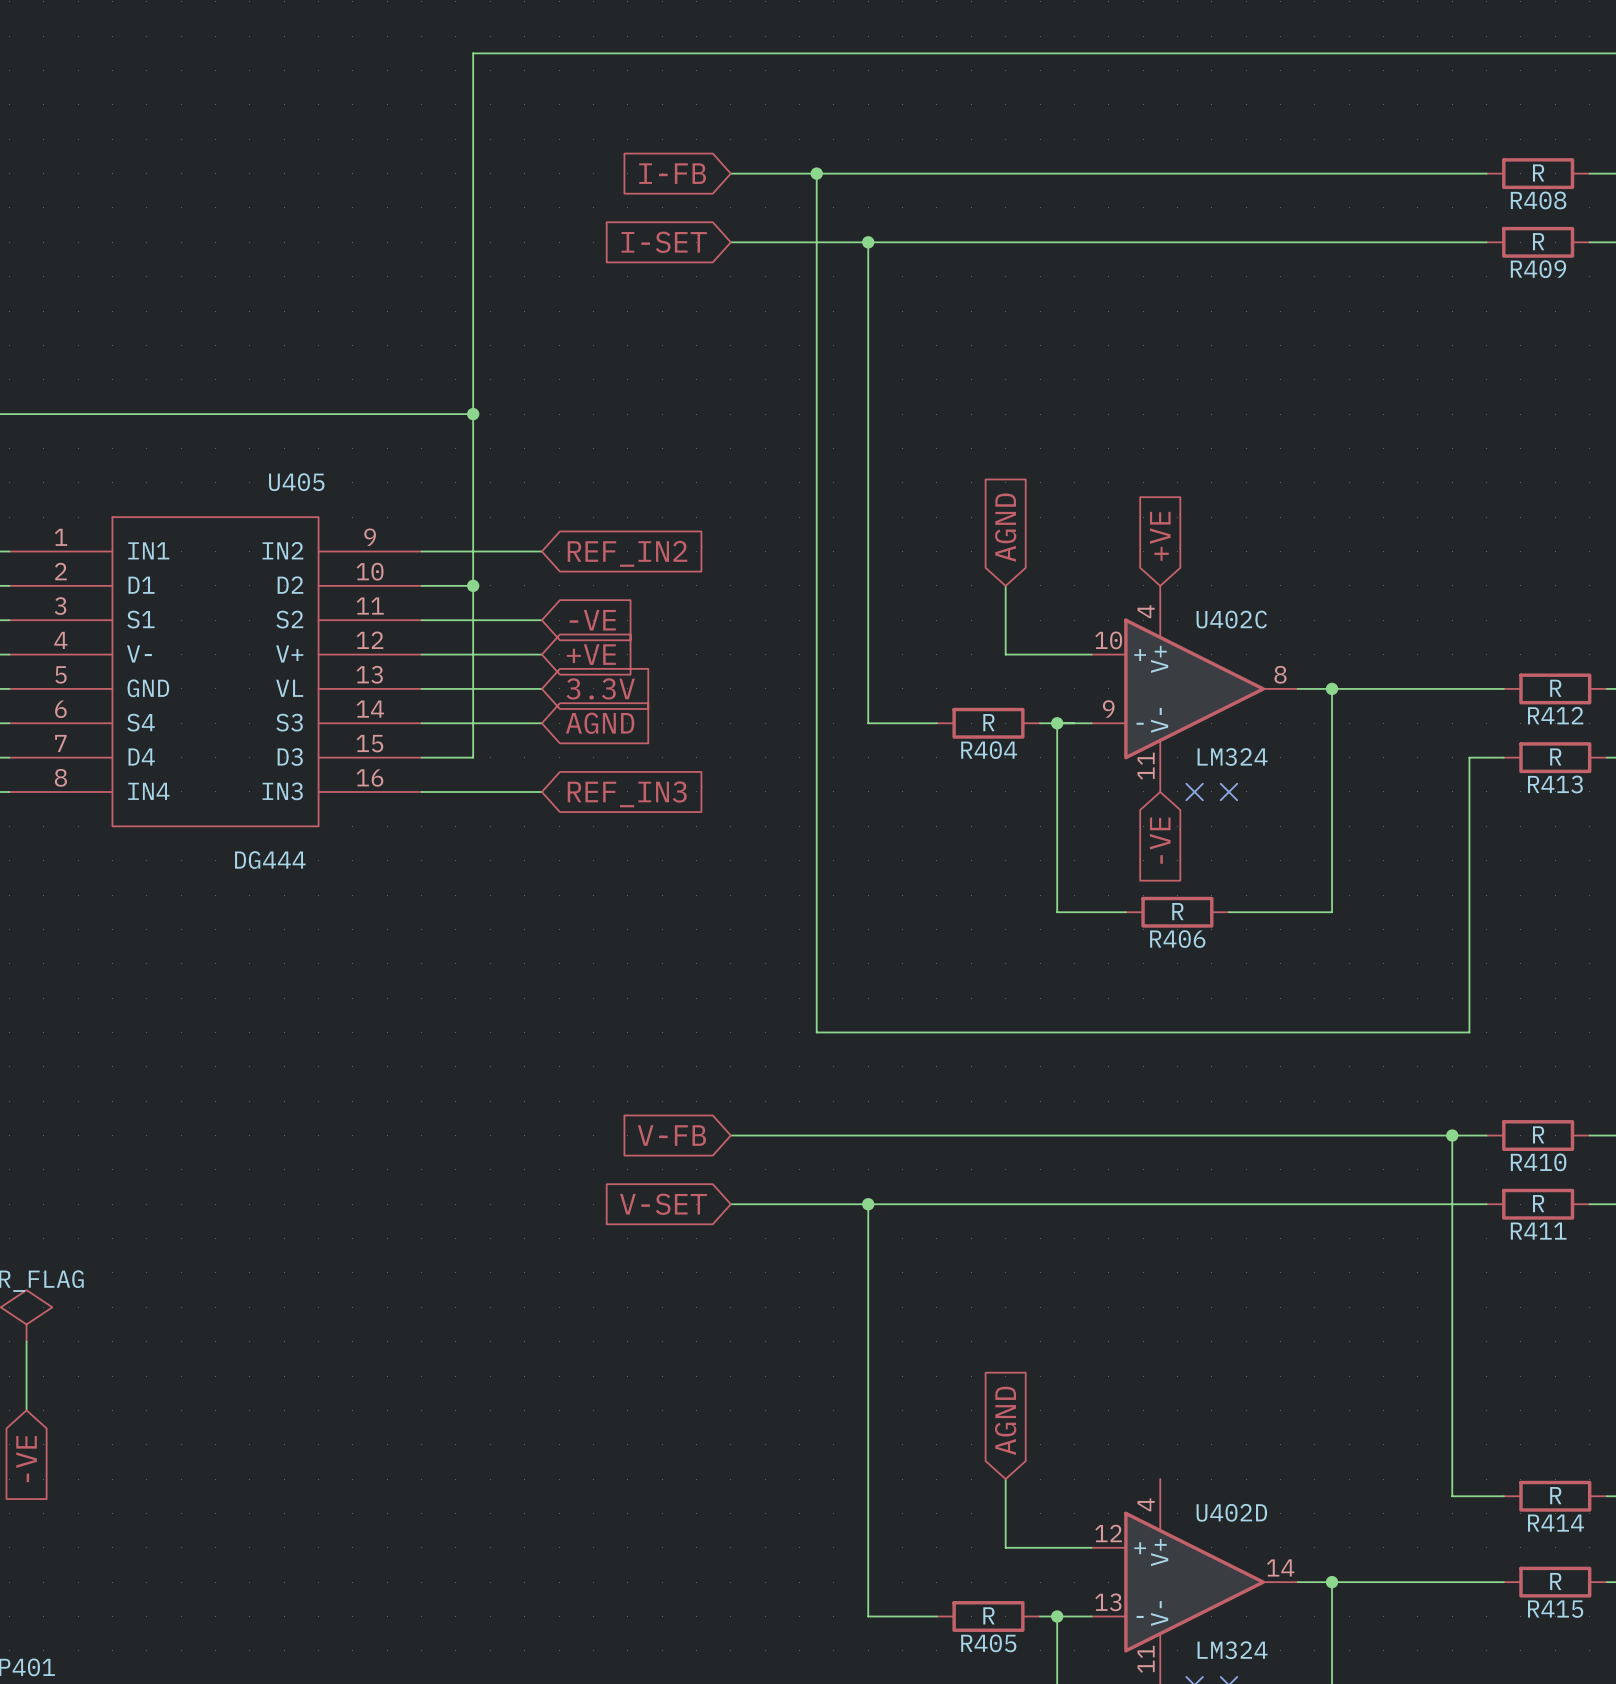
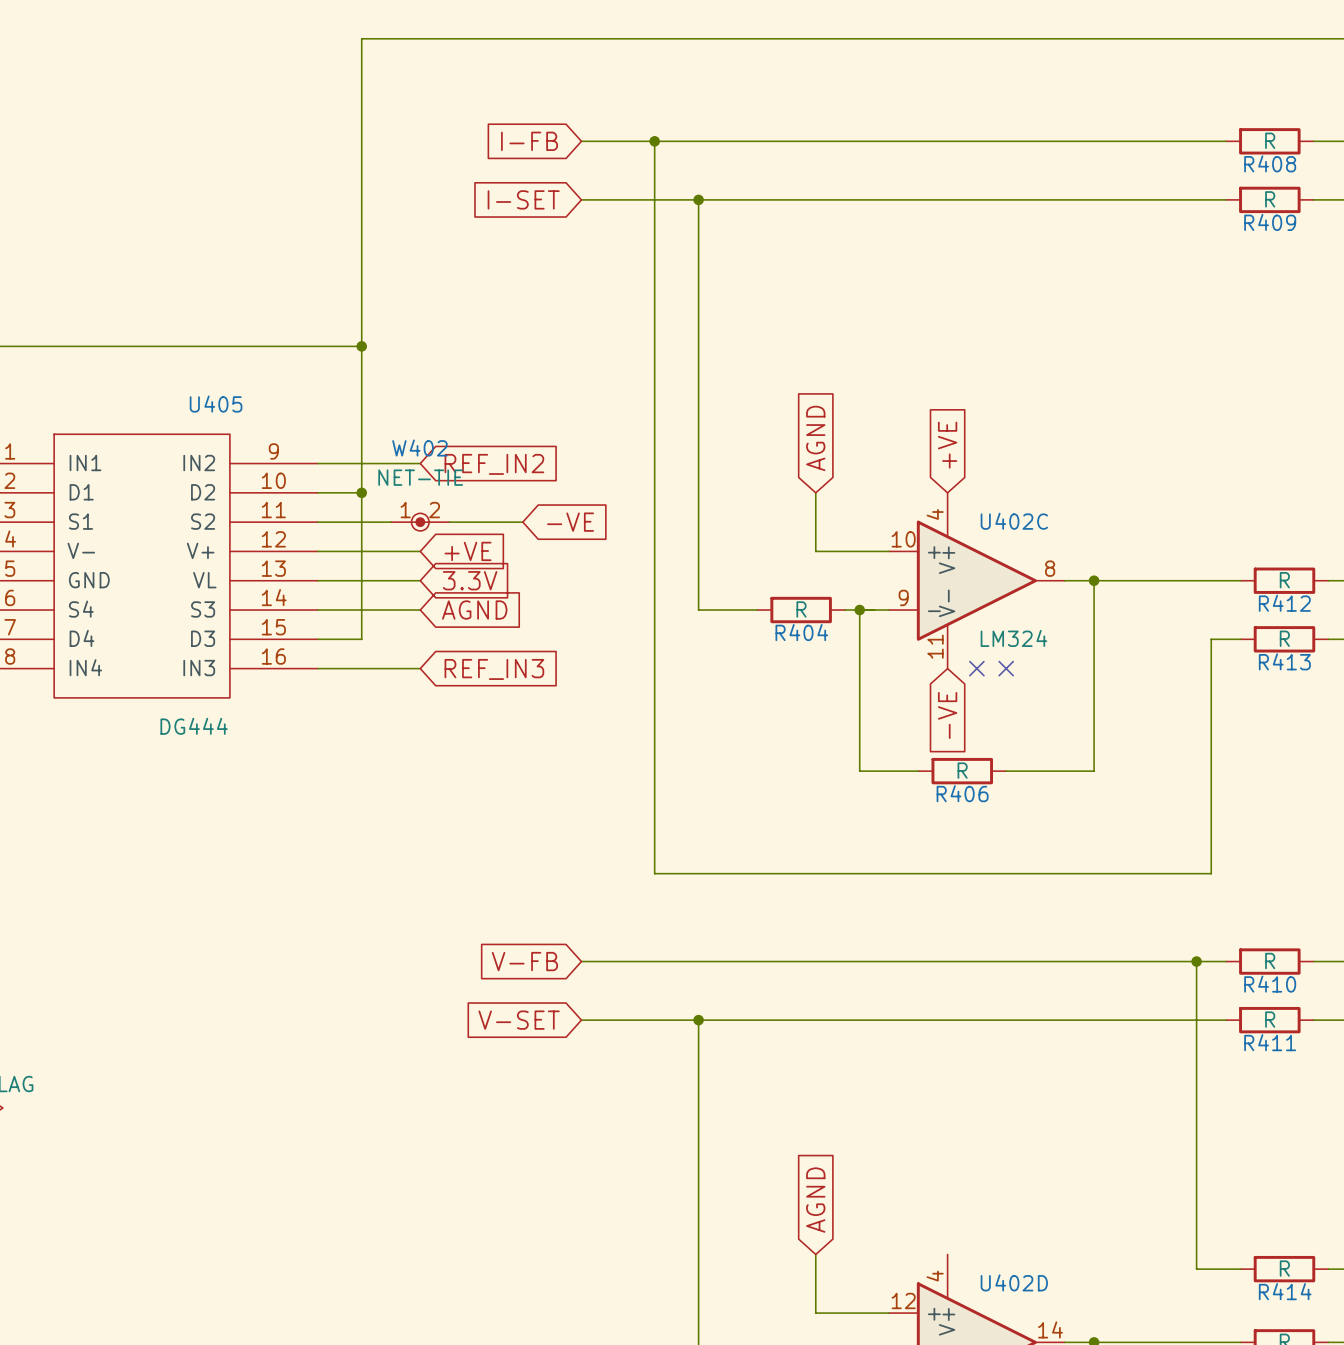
W402: none -> NET-TIE (420, 522)
wire: none -> (449, 522) (522, 522)
global label position: -VE (592, 620) -> -VE (570, 522)

